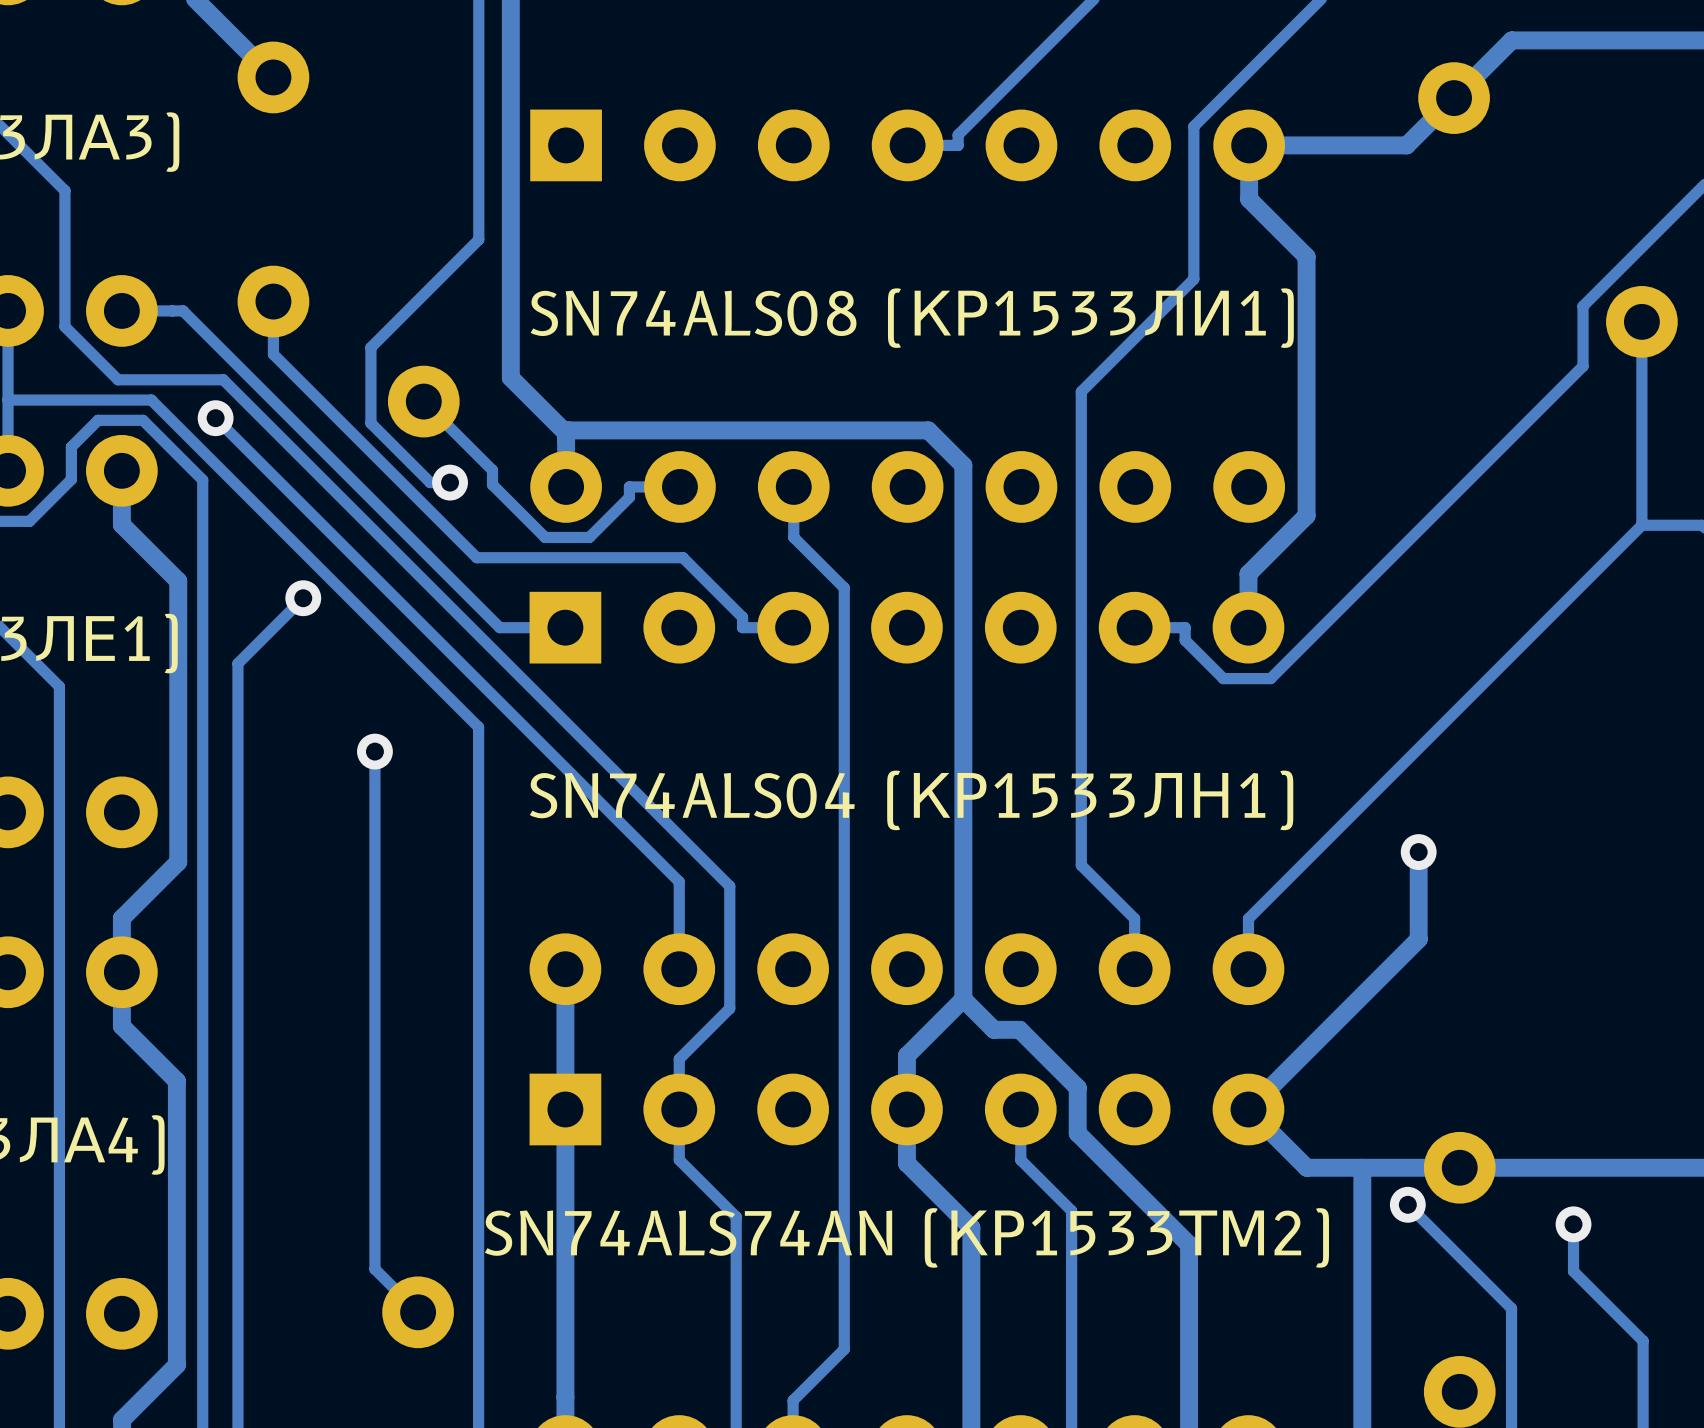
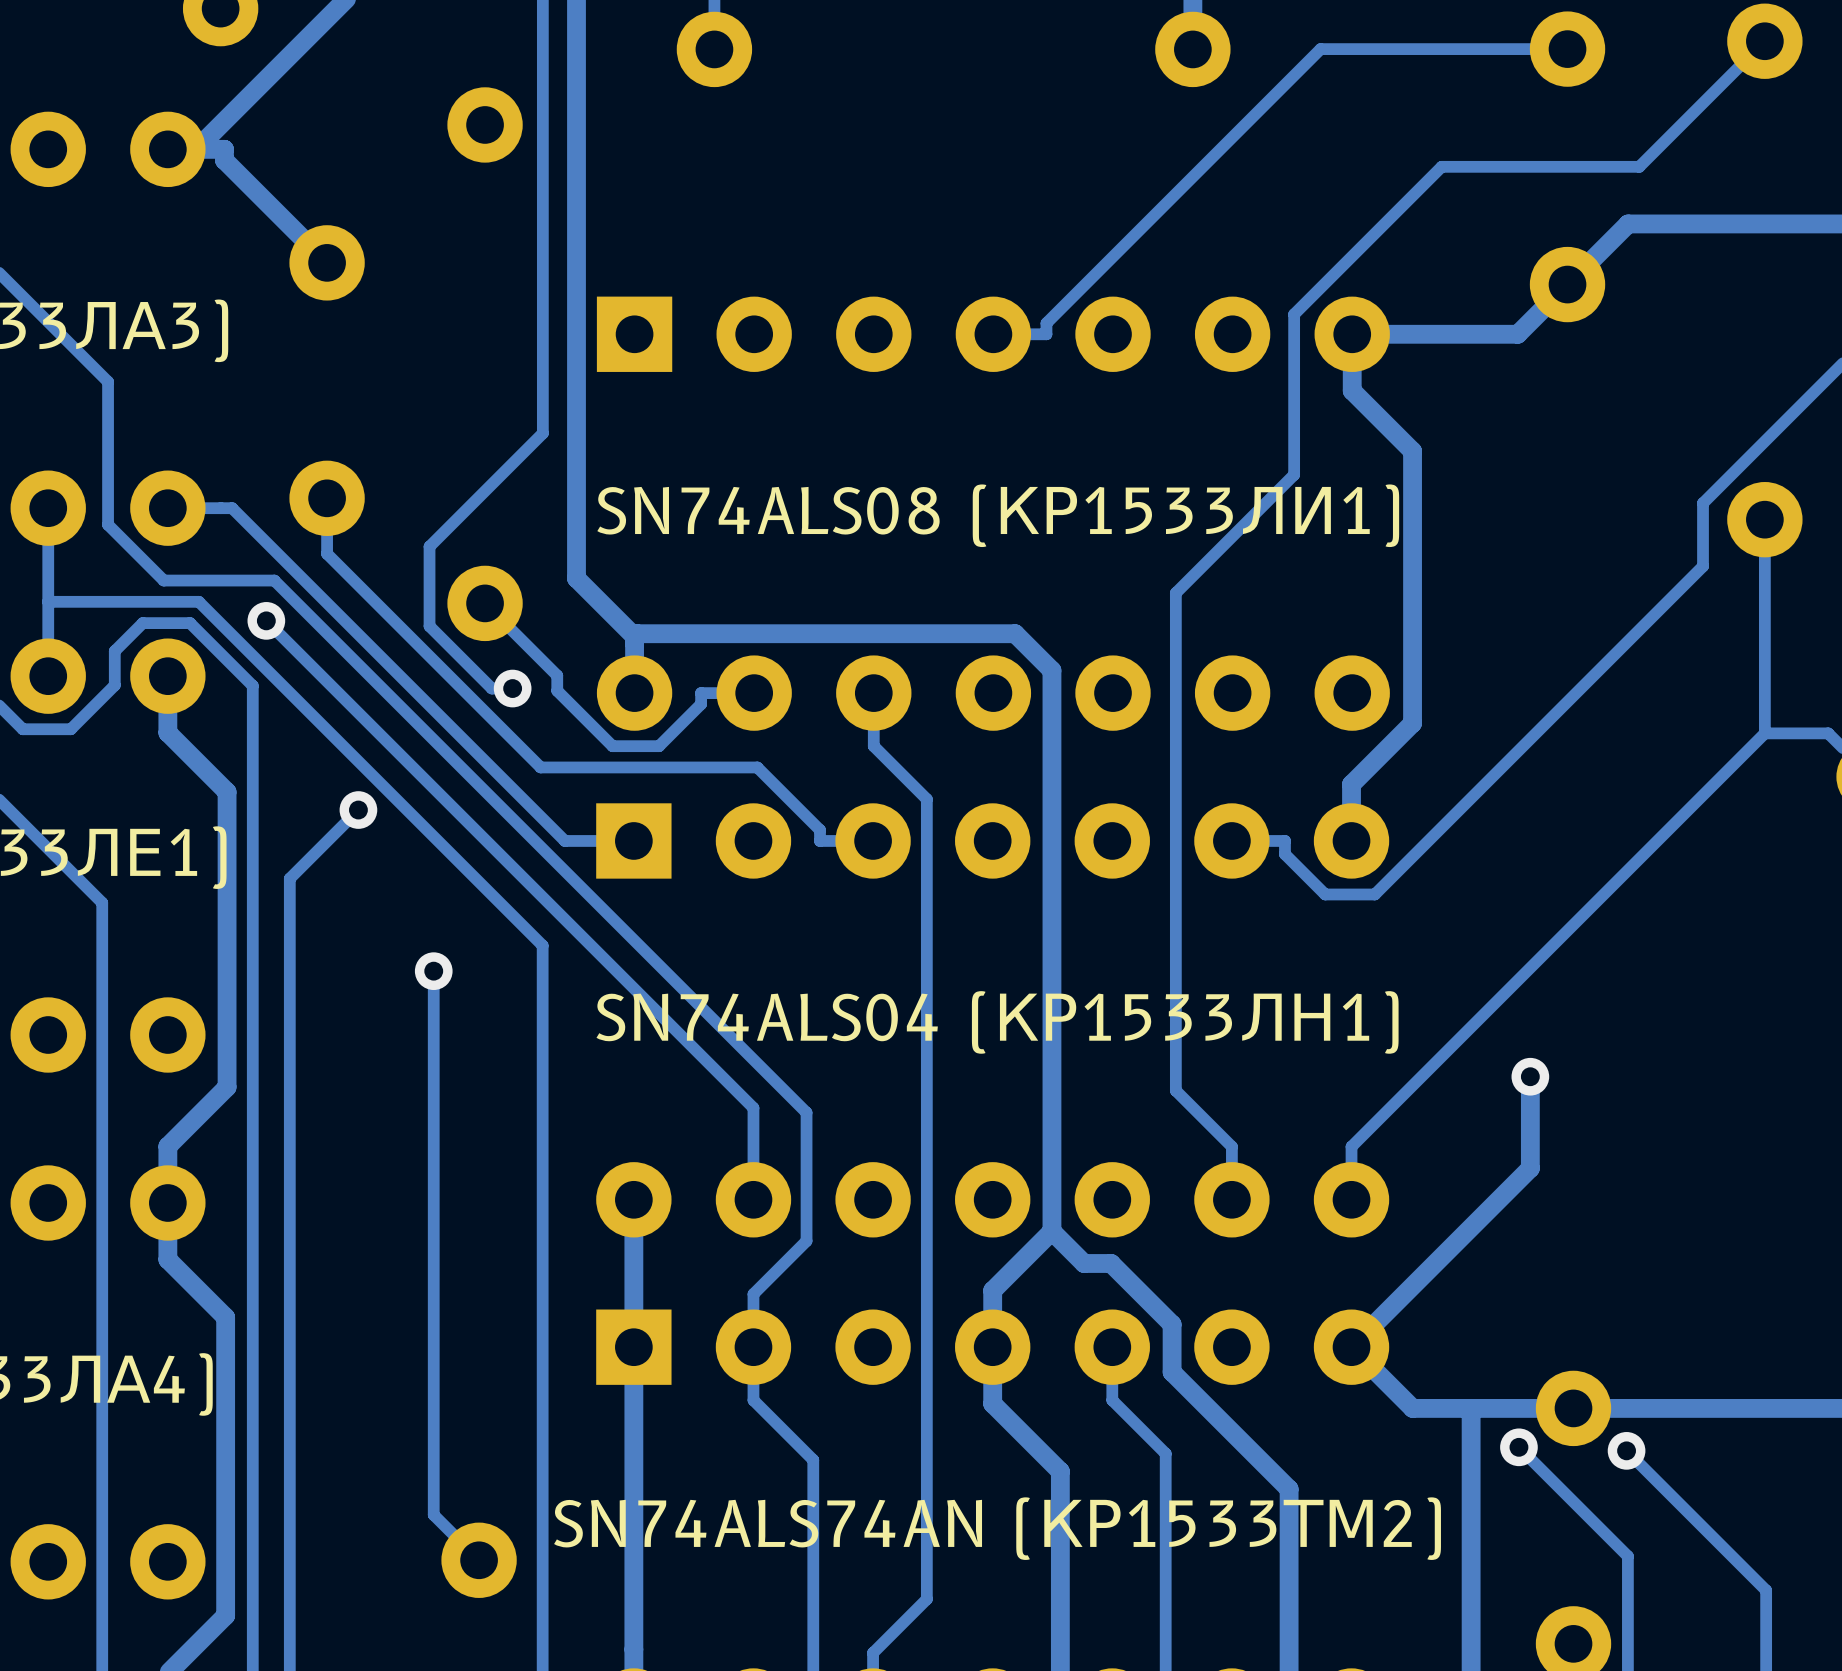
track: (1573, 1224) (1573, 1271) -> (1626, 1450) (1693, 1517)
via position: (1573, 1224) -> (1626, 1450)
part value position: SN74ALS74AN (КР1533ТМ2) (906, 1237) -> SN74ALS74AN (КР1533ТМ2) (997, 1528)

